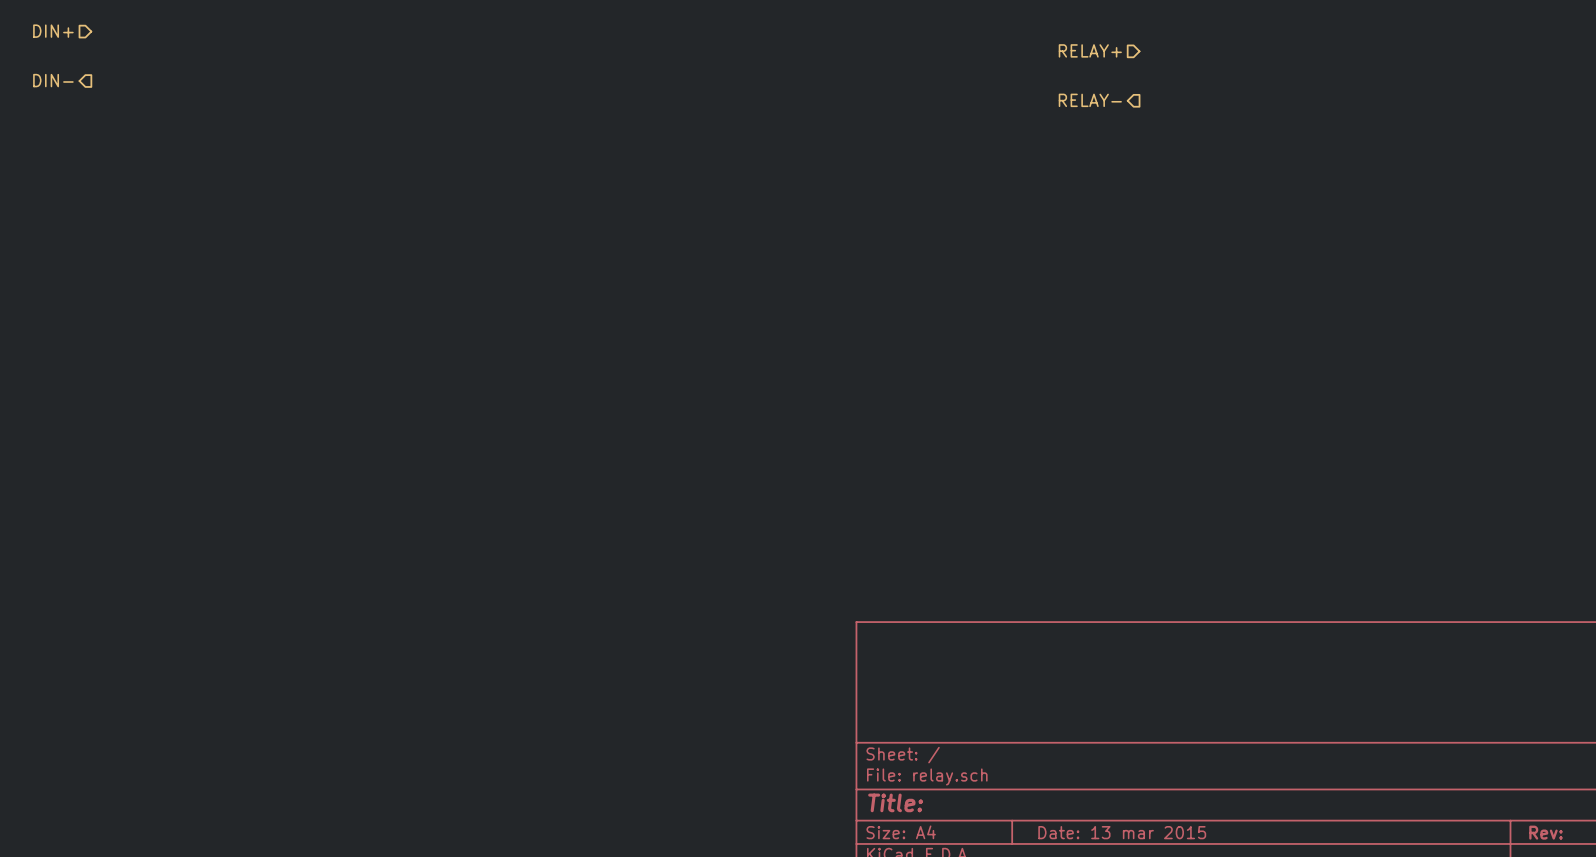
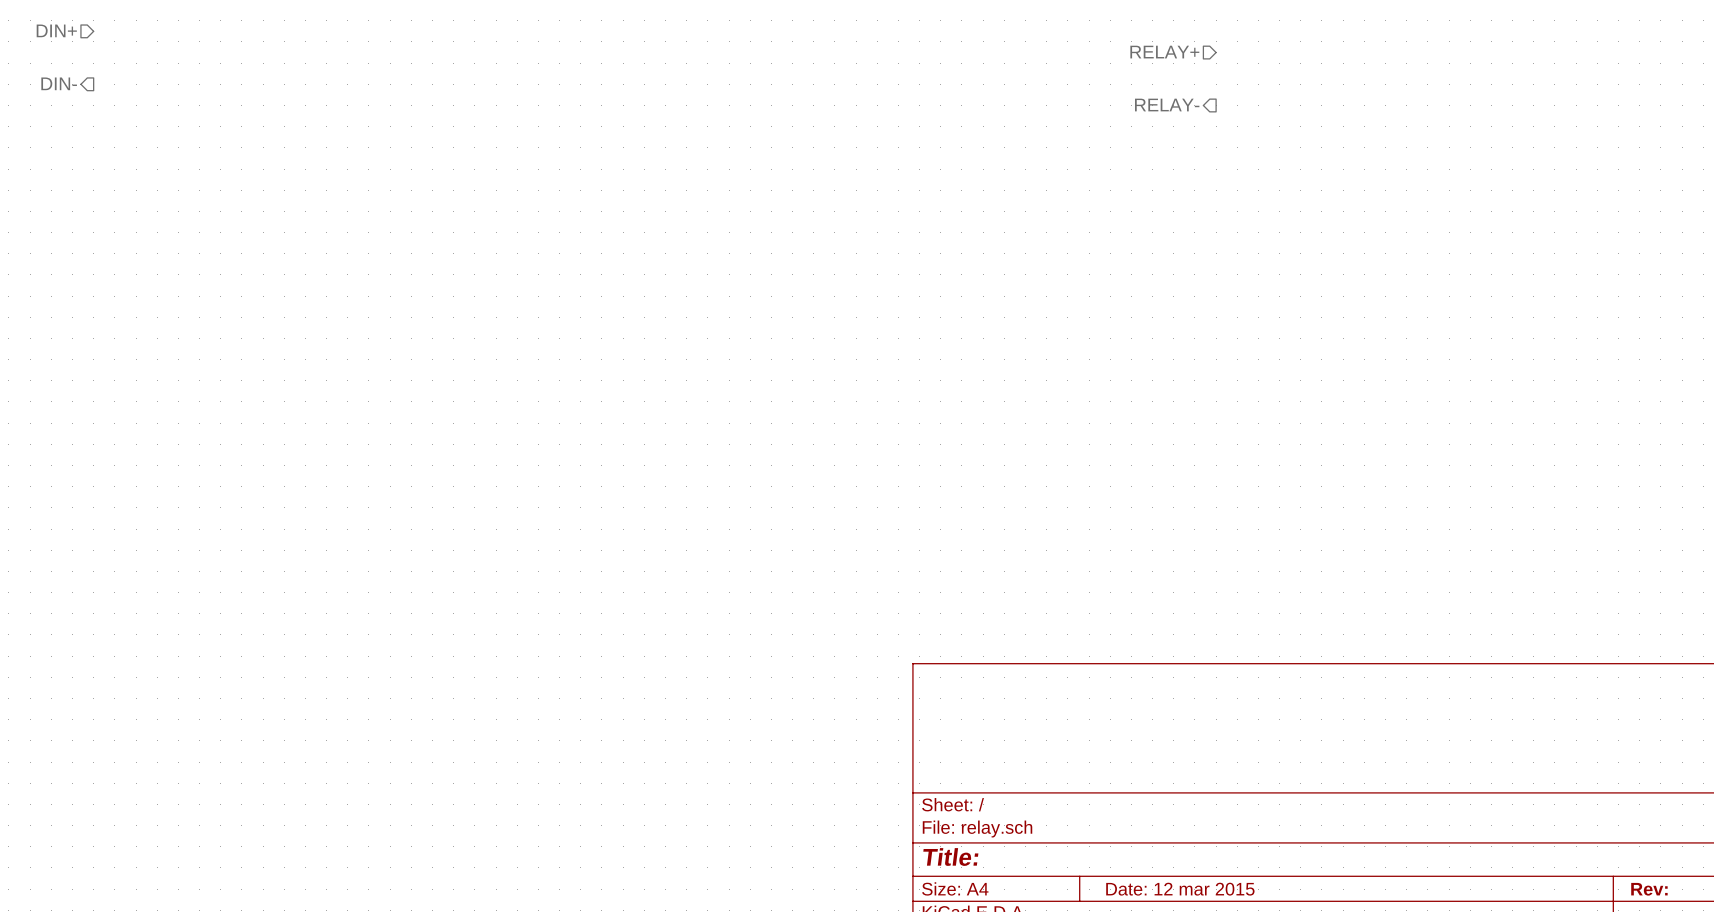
title block: Date: 13 mar 2015 (1122, 832) -> Date: 12 mar 2015 (1180, 889)

